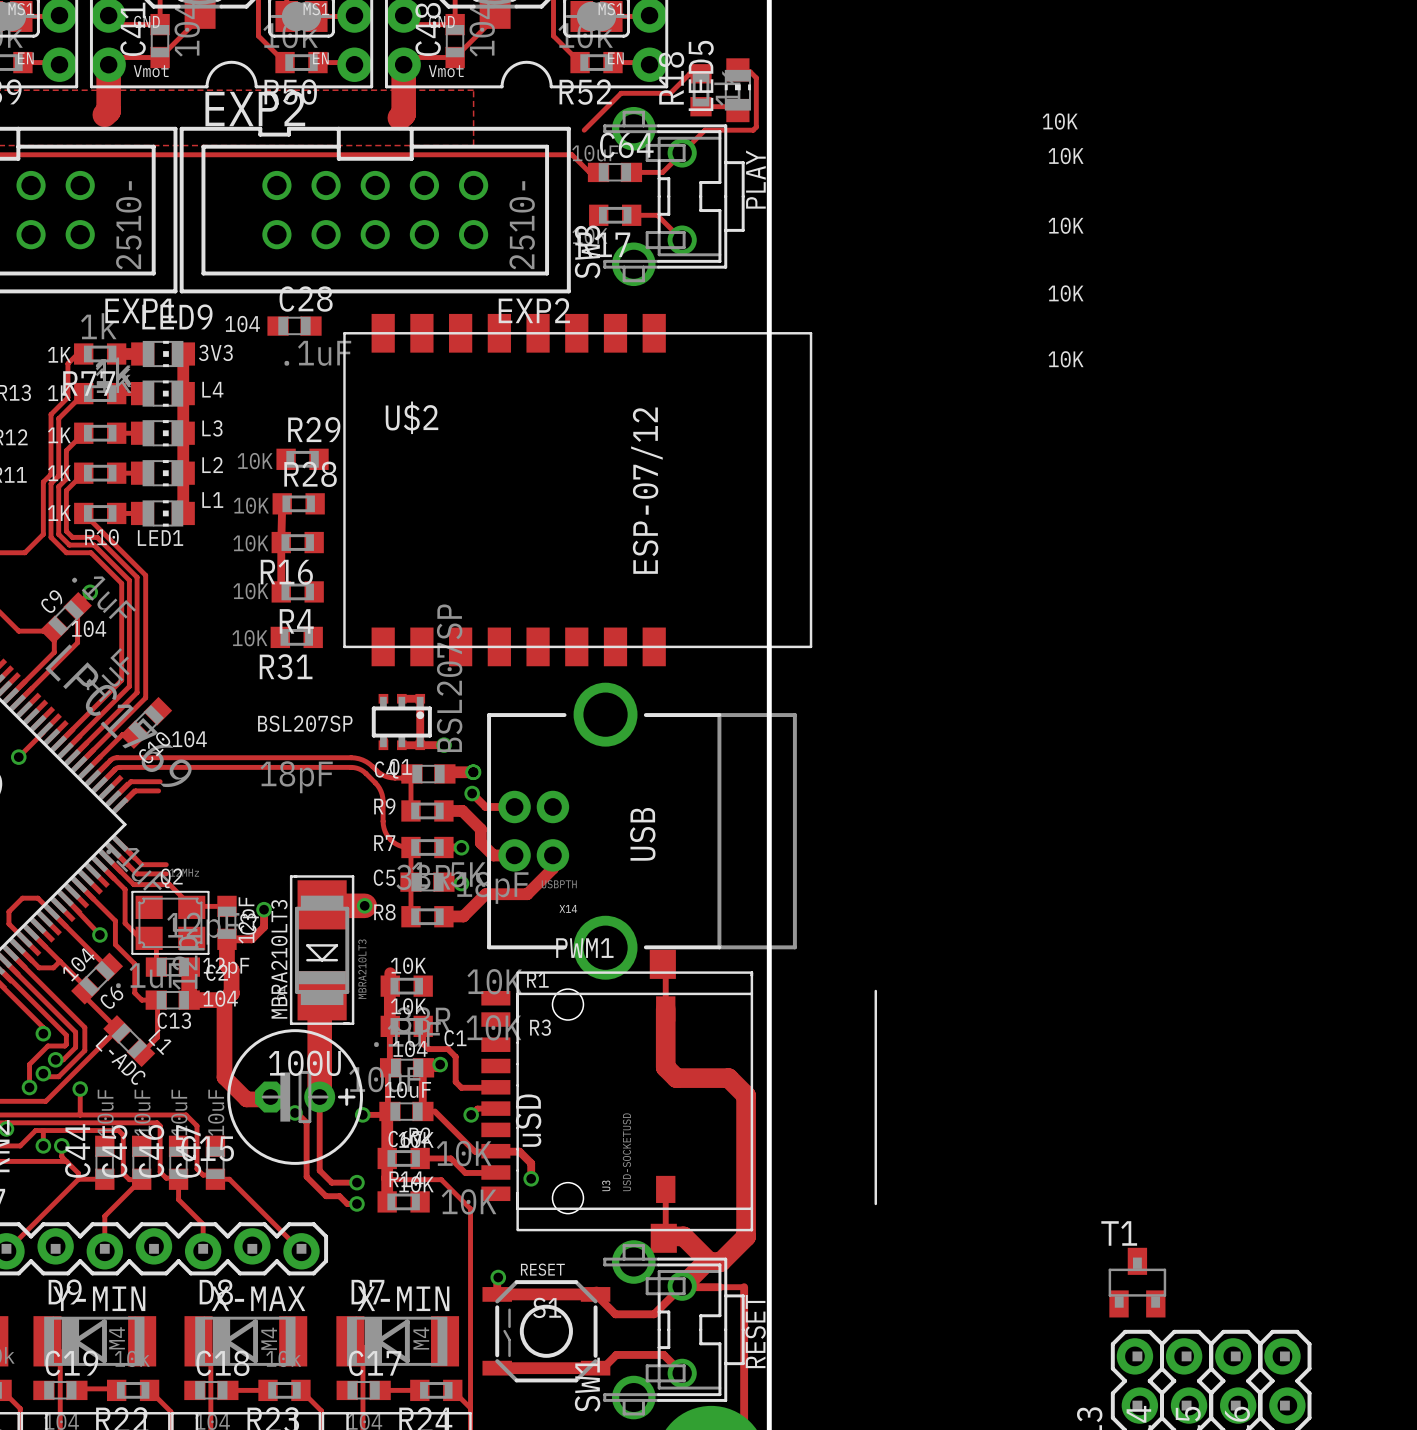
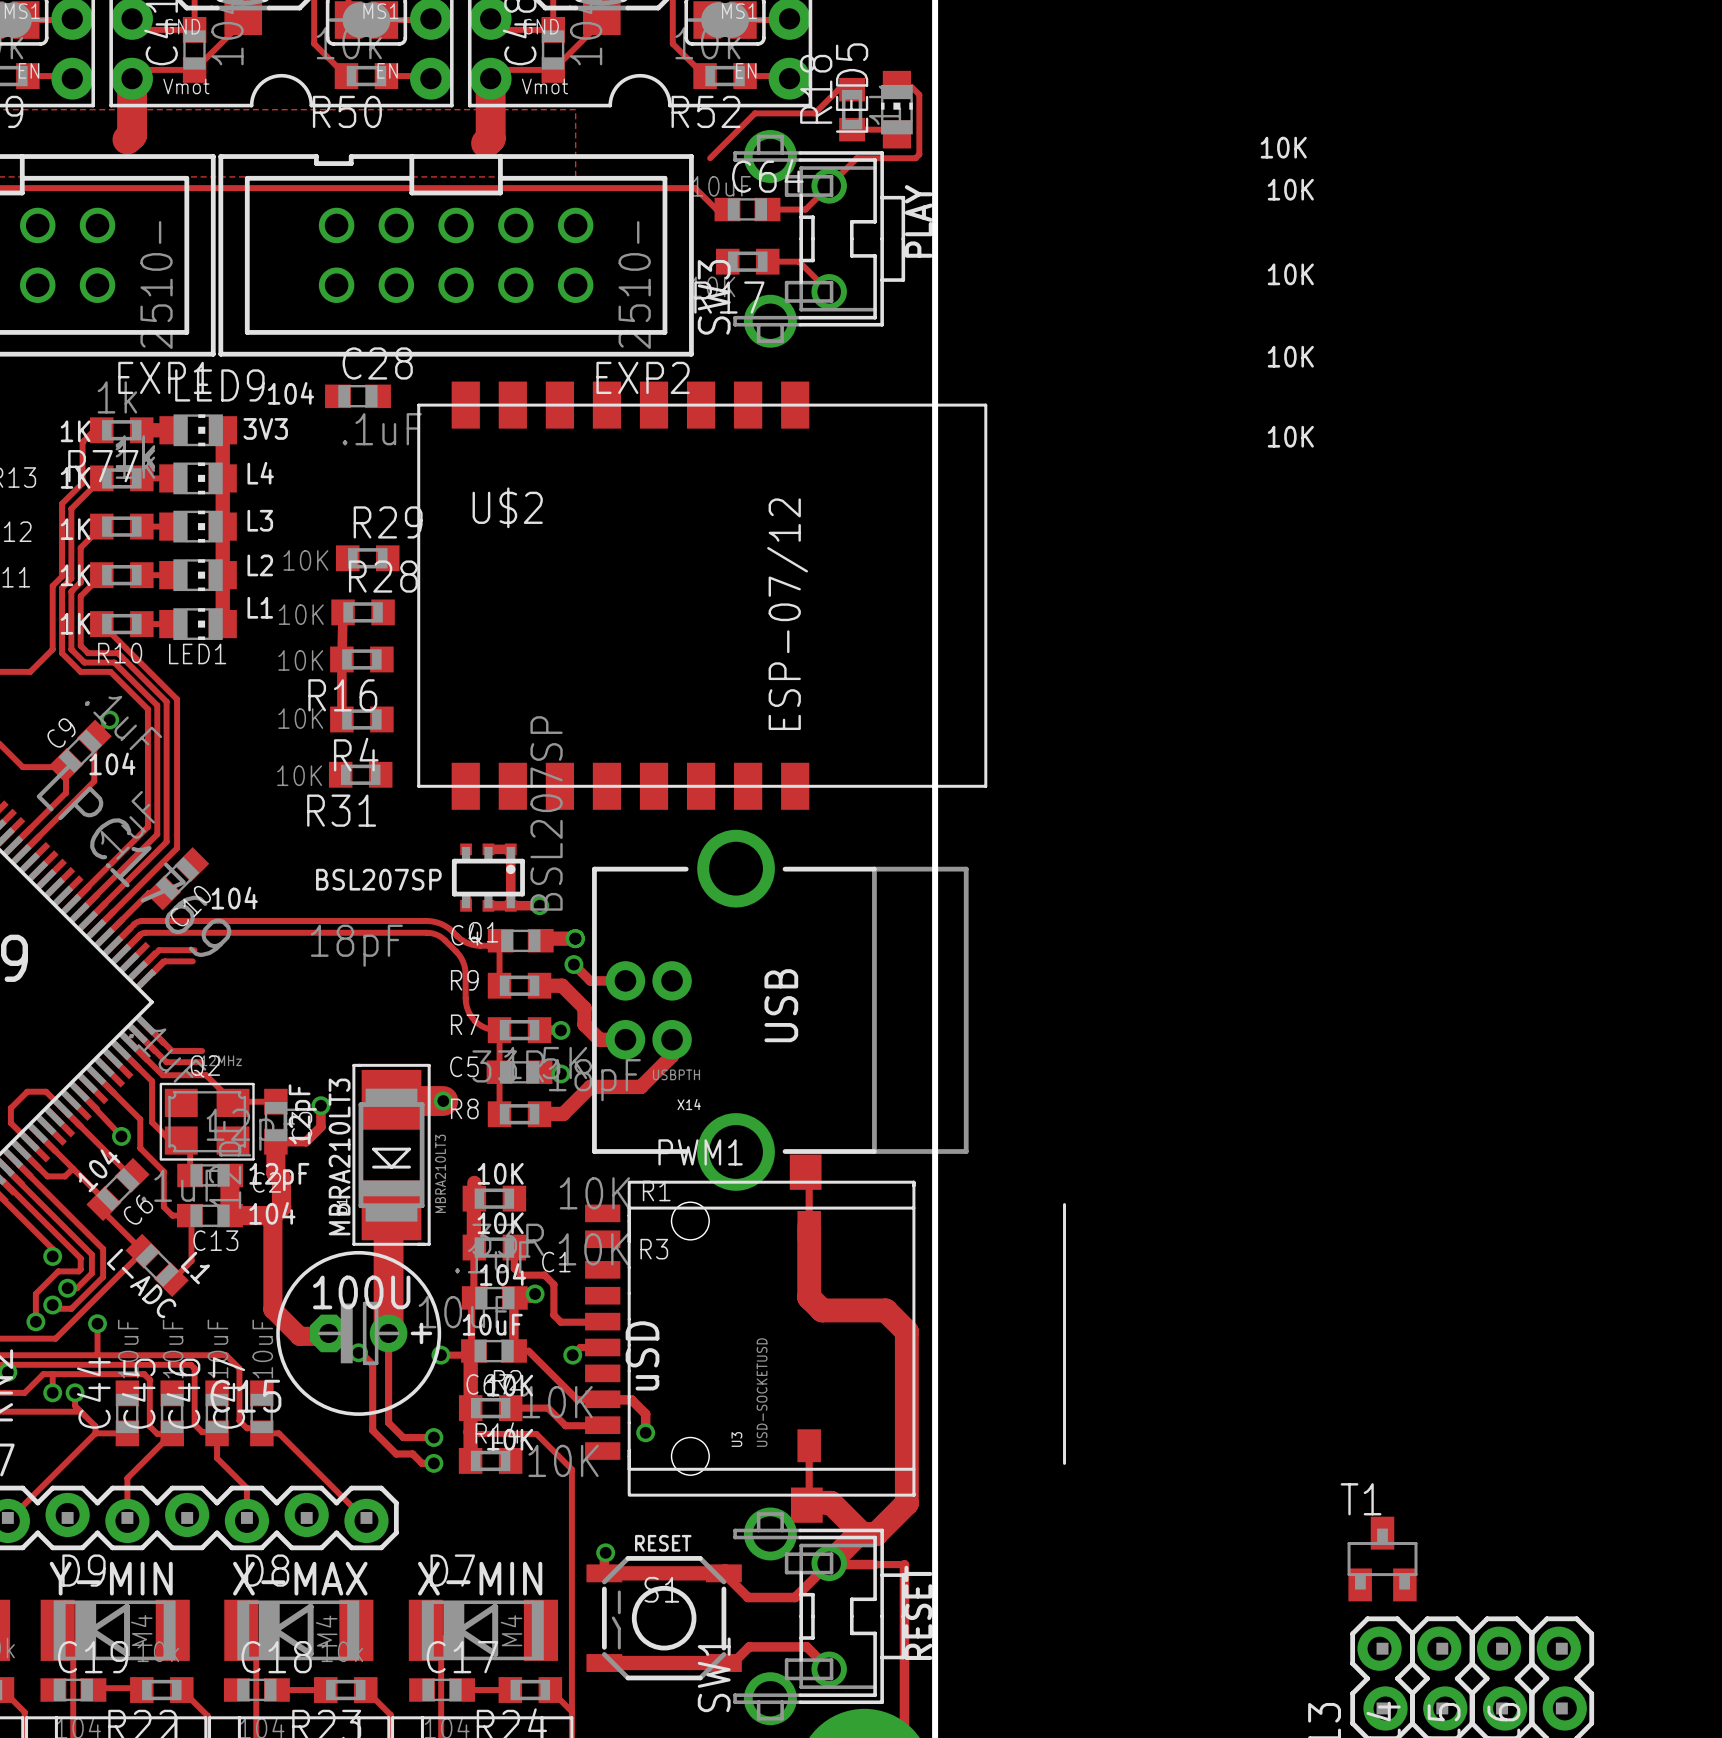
text: EXP2 (255, 108) -> none
track: (43, 732) (18, 757) -> none
via: (18, 757) -> none

